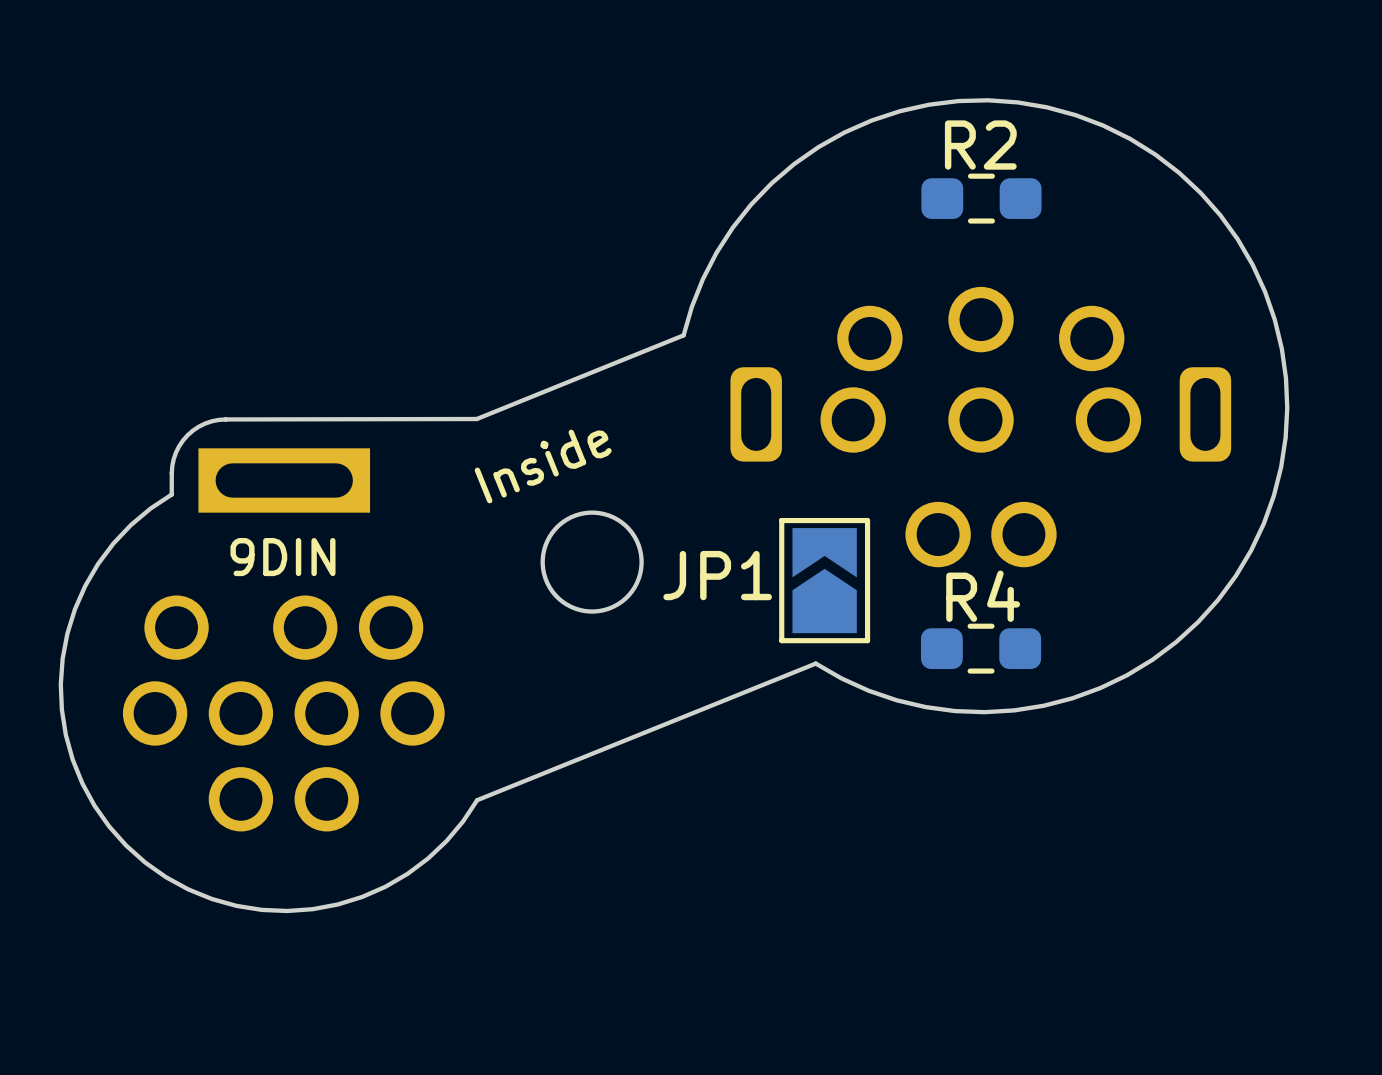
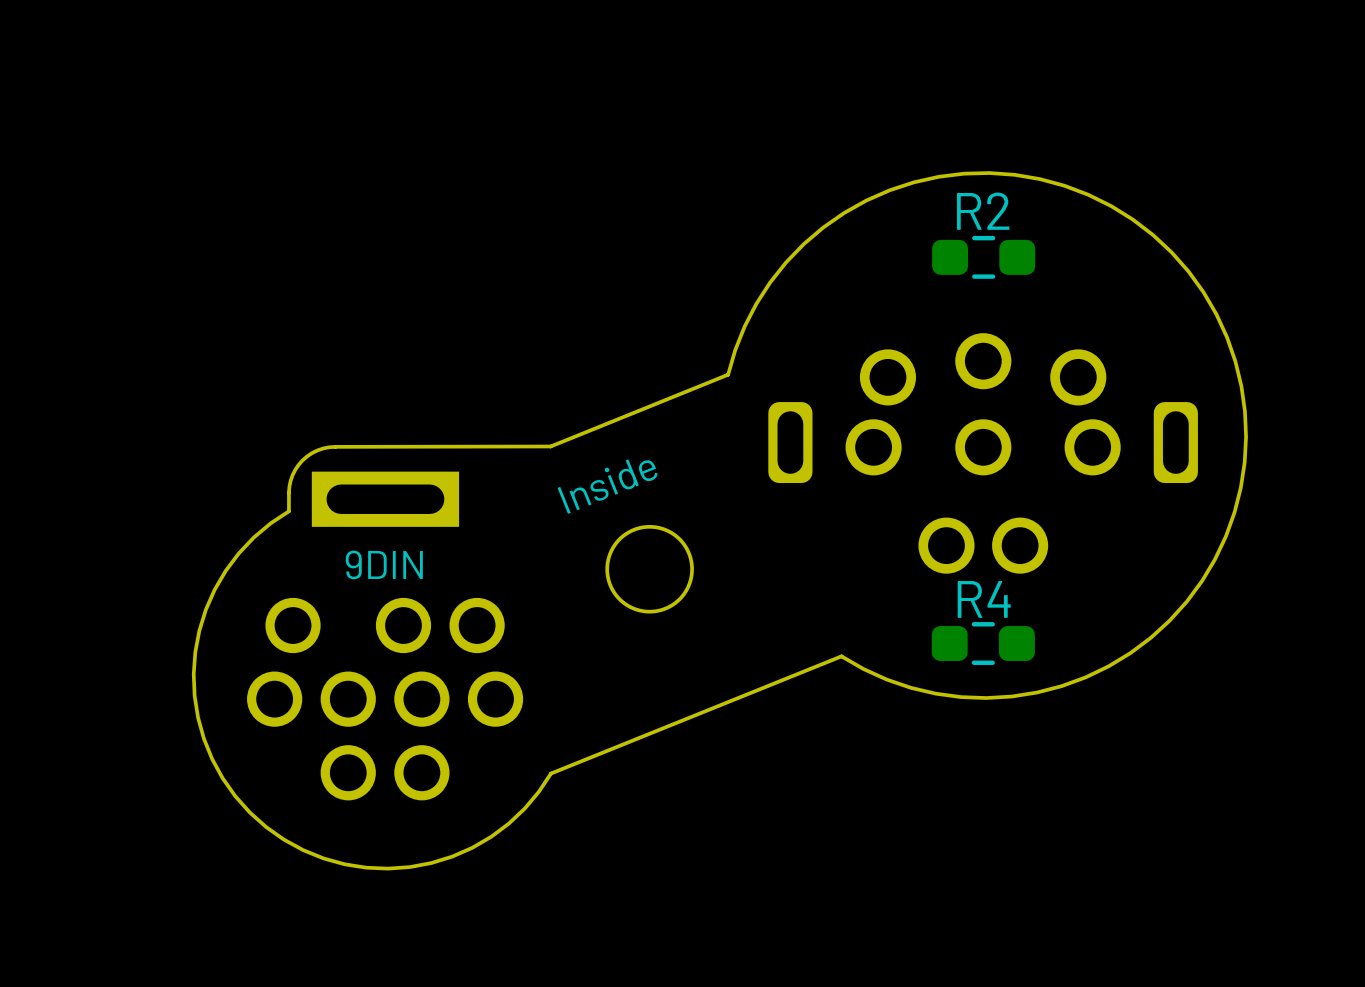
JP1: (824, 580) -> none

